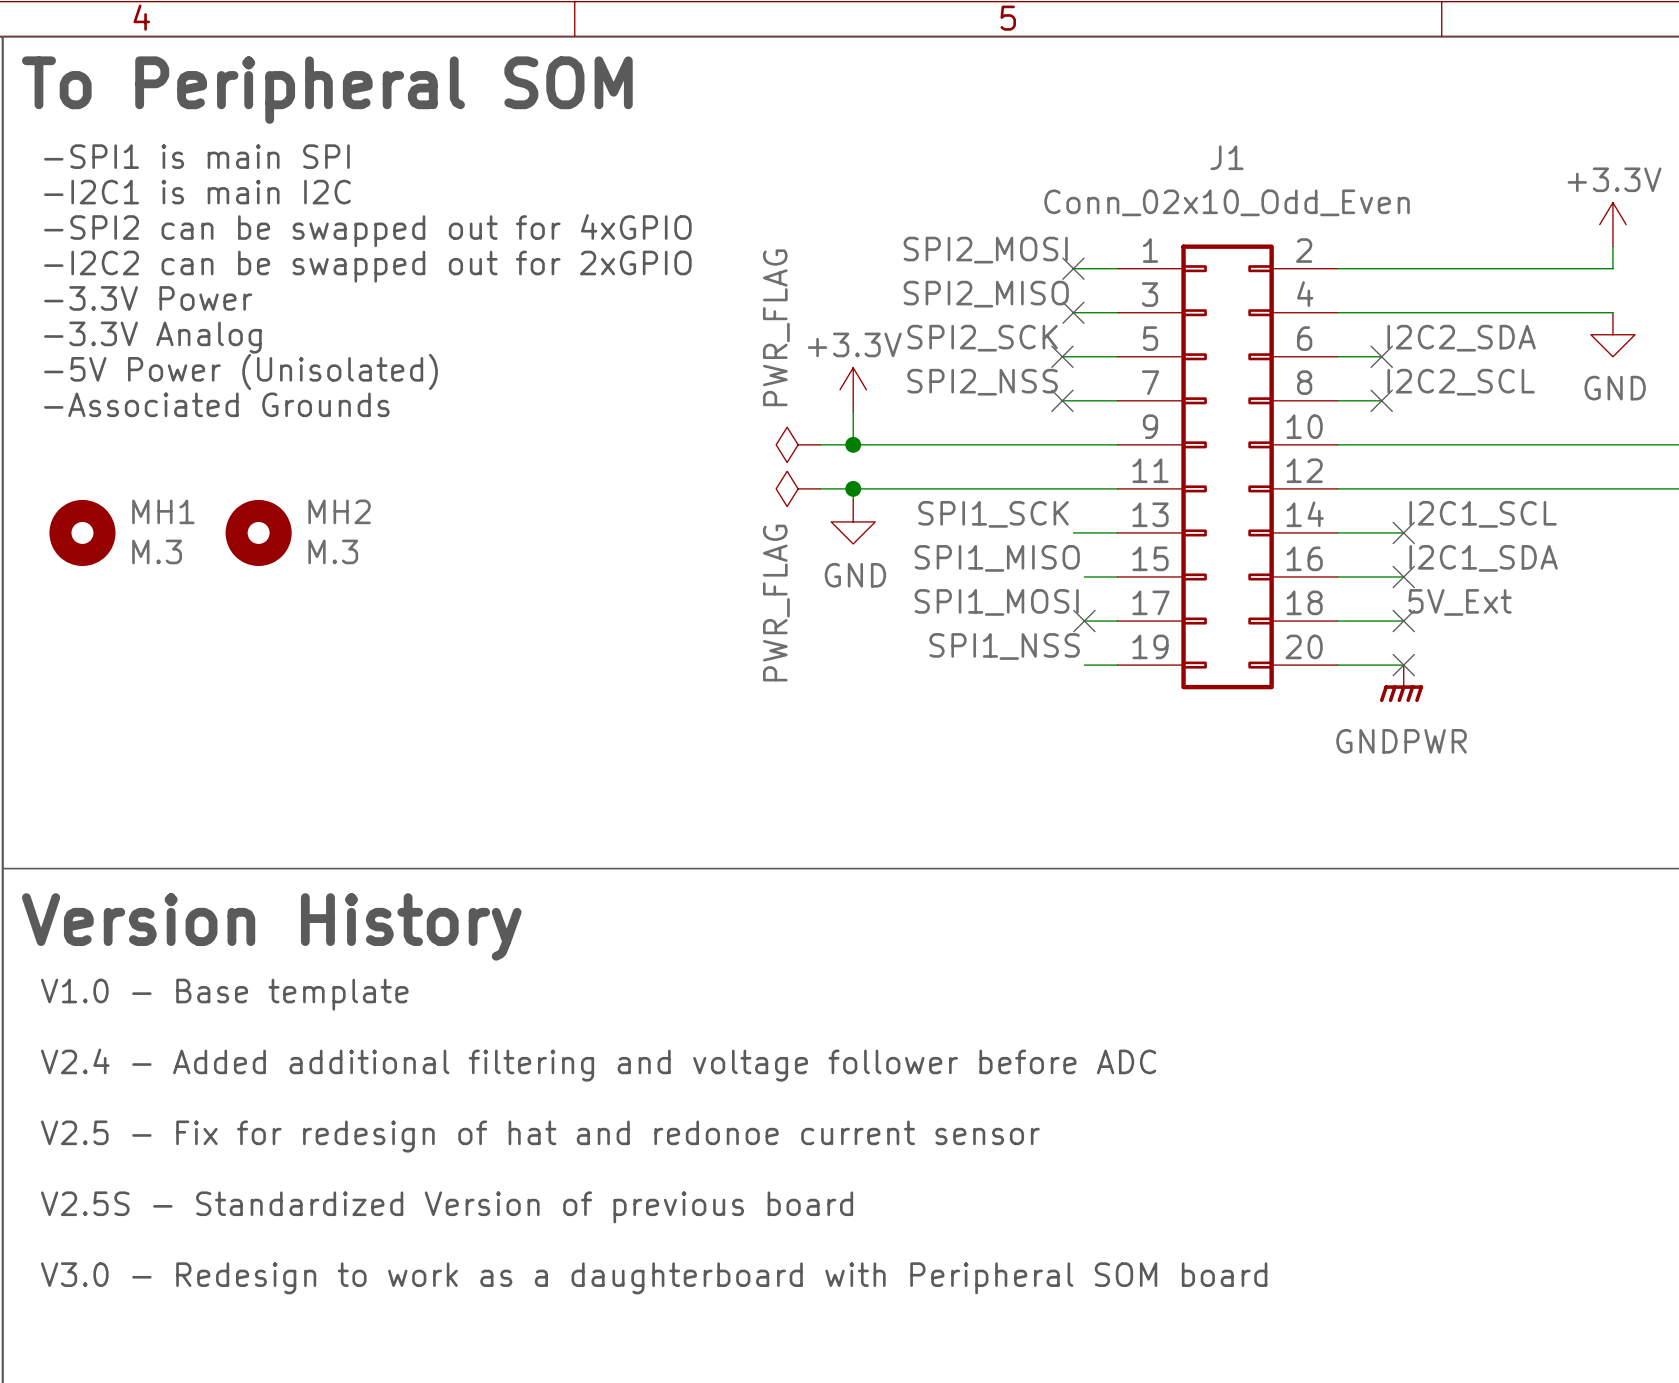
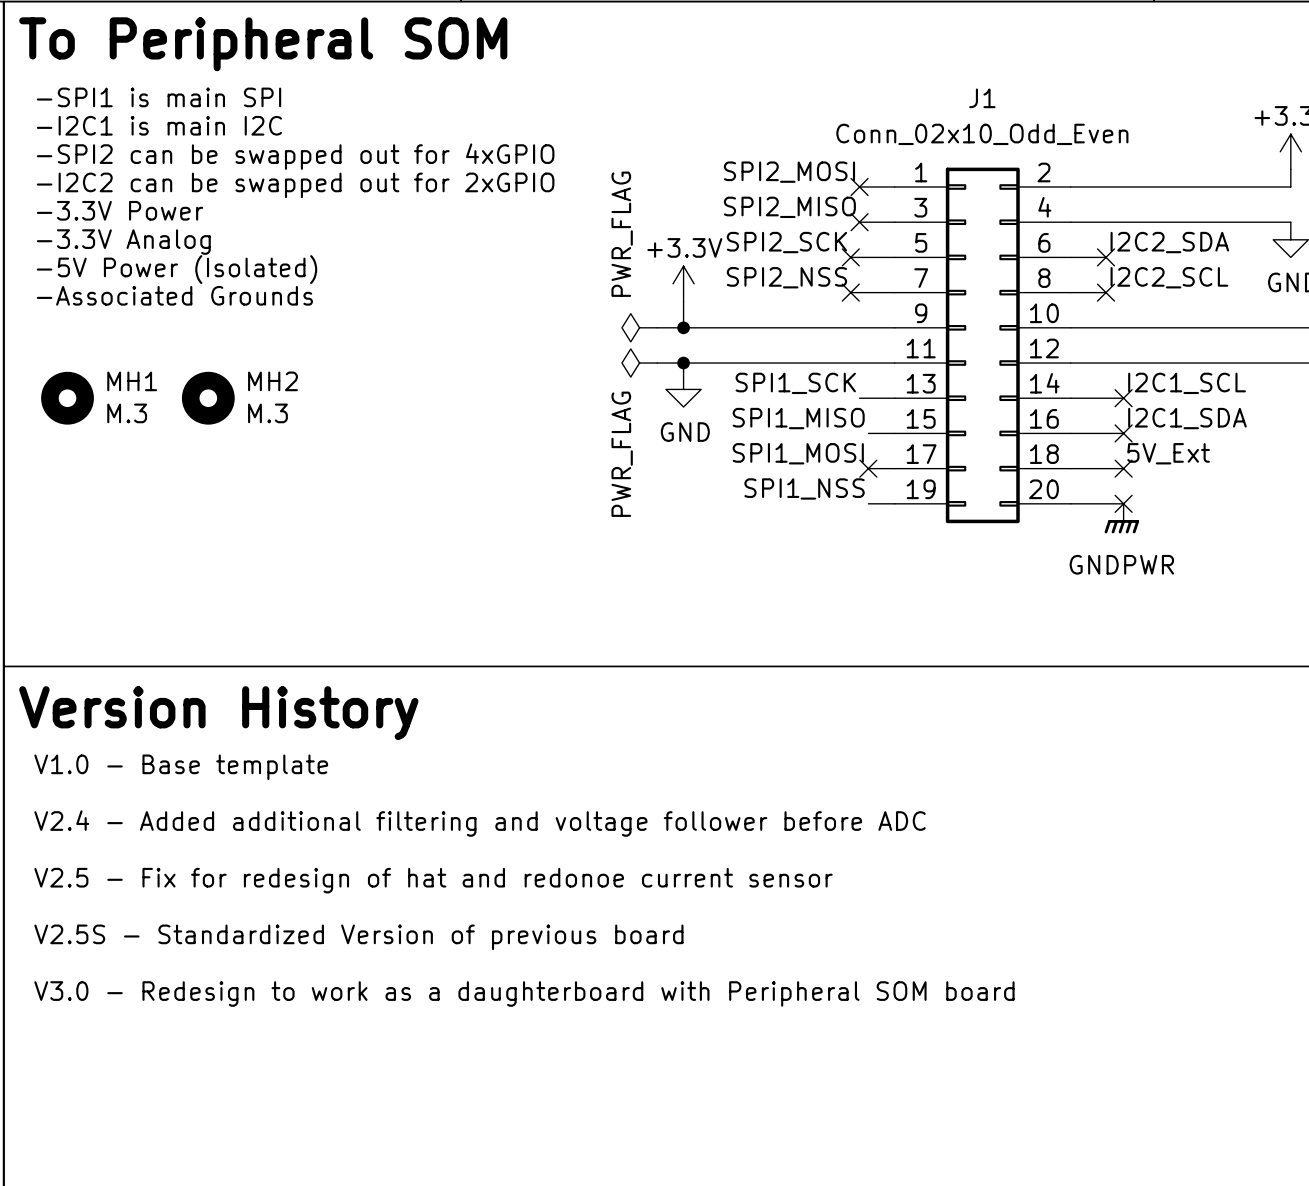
text: -5V Power (Unisolated) (240, 371) -> -5V Power (Isolated) (177, 269)

